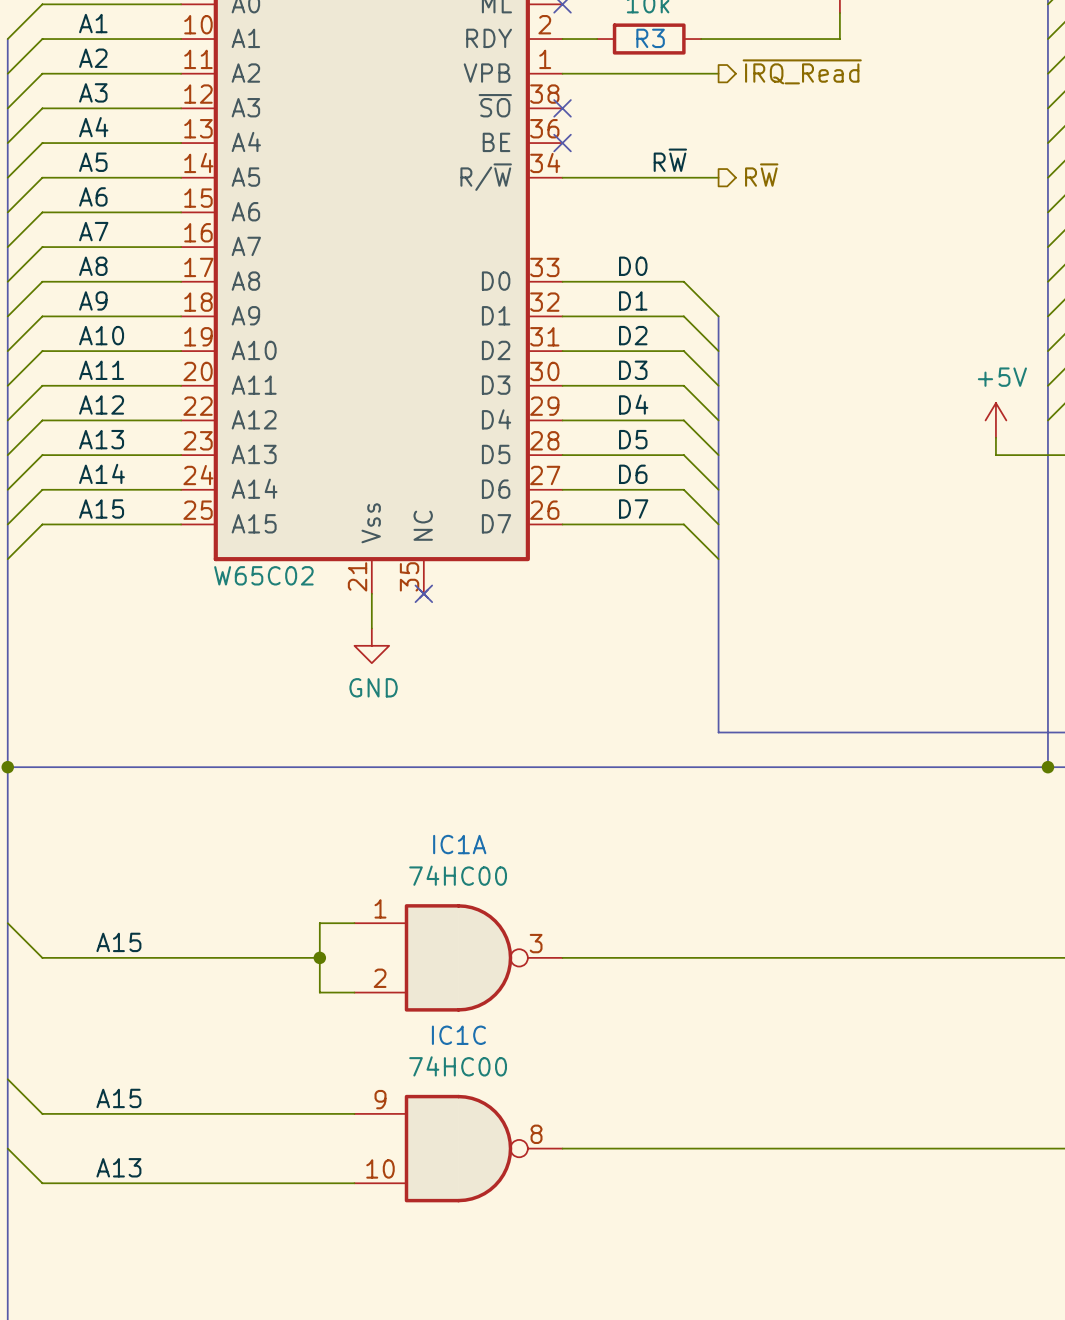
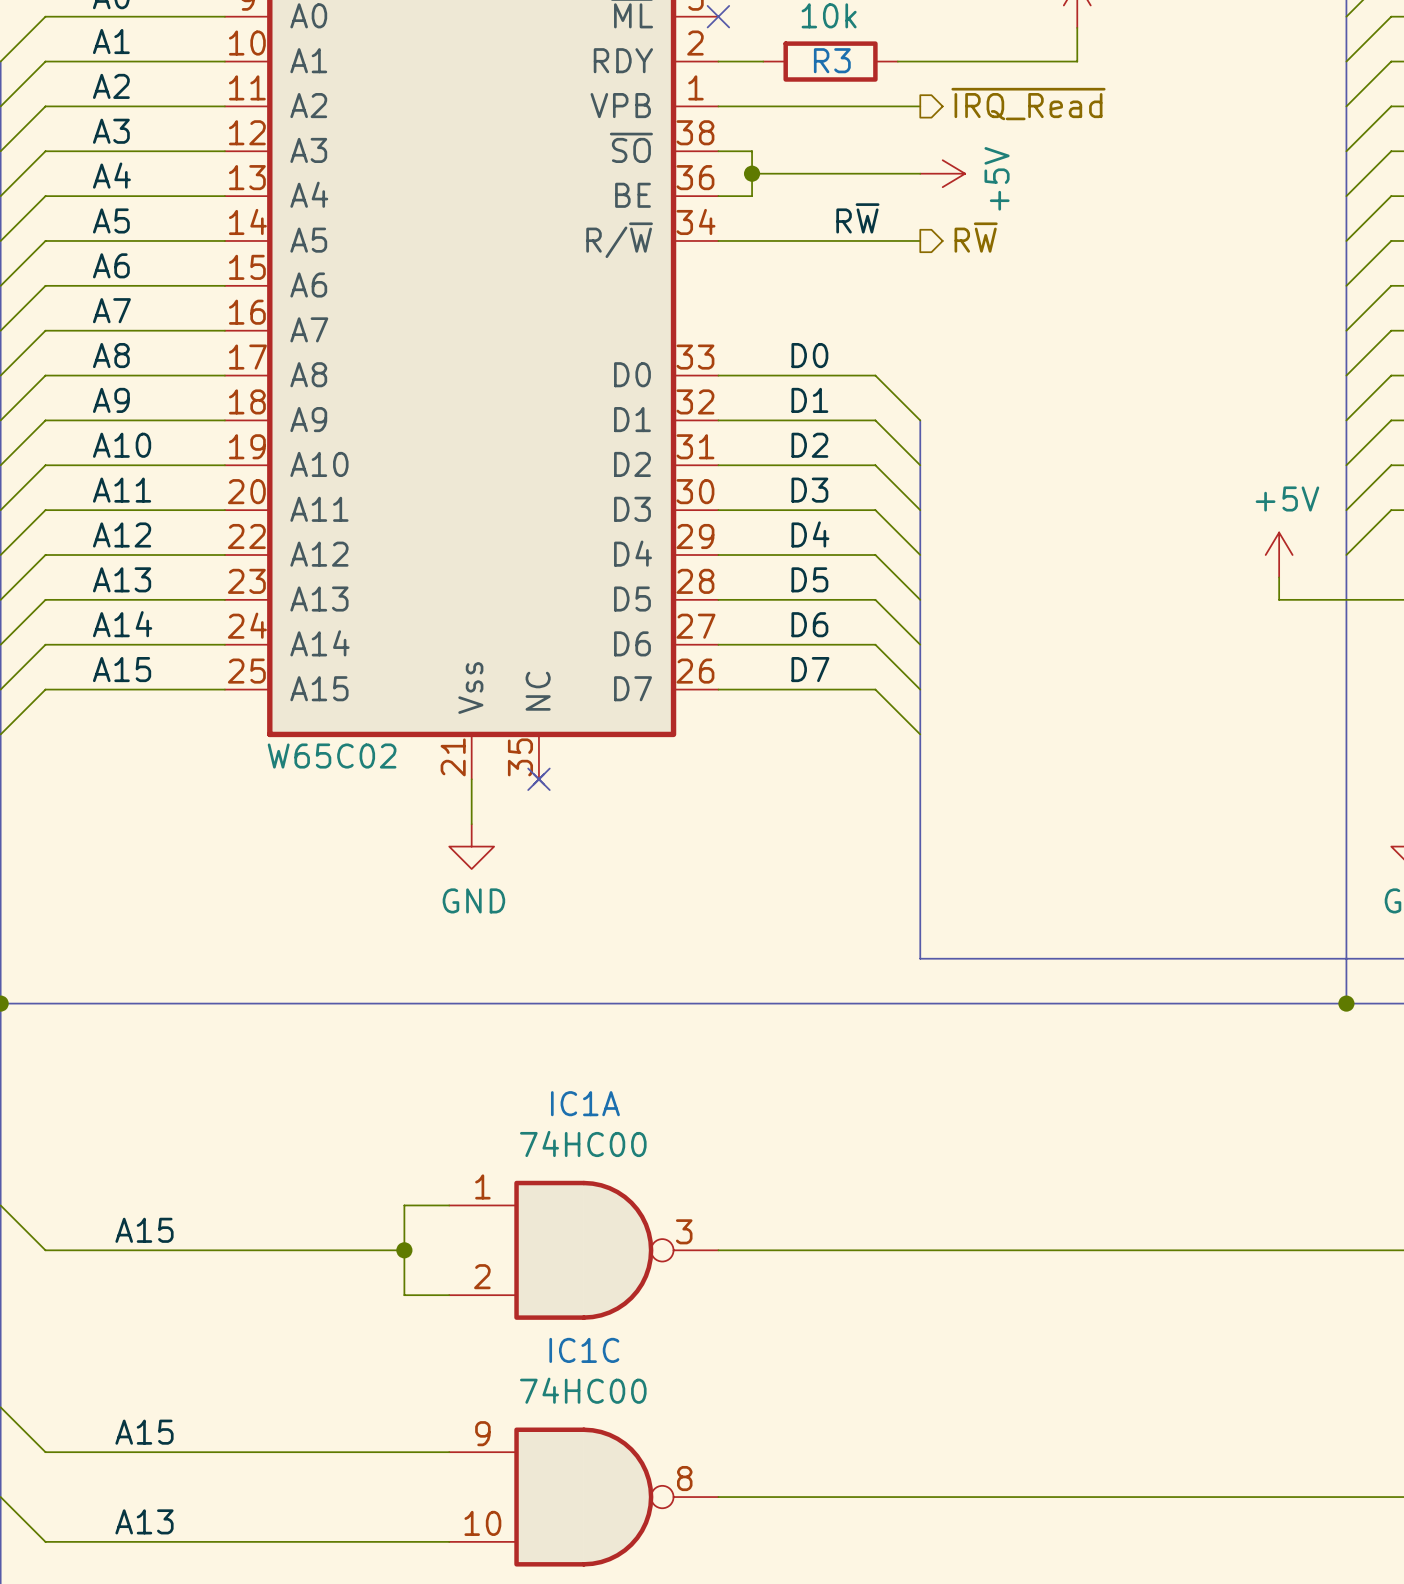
wire: none -> (718, 151) (752, 151) (752, 196) (718, 196)
no-connect mark: (562, 108) -> none
wire: none -> (752, 173) (920, 173)
junction: none -> (752, 173)
power symbol: none -> +5V (942, 173)
no-connect mark: (562, 143) -> none

